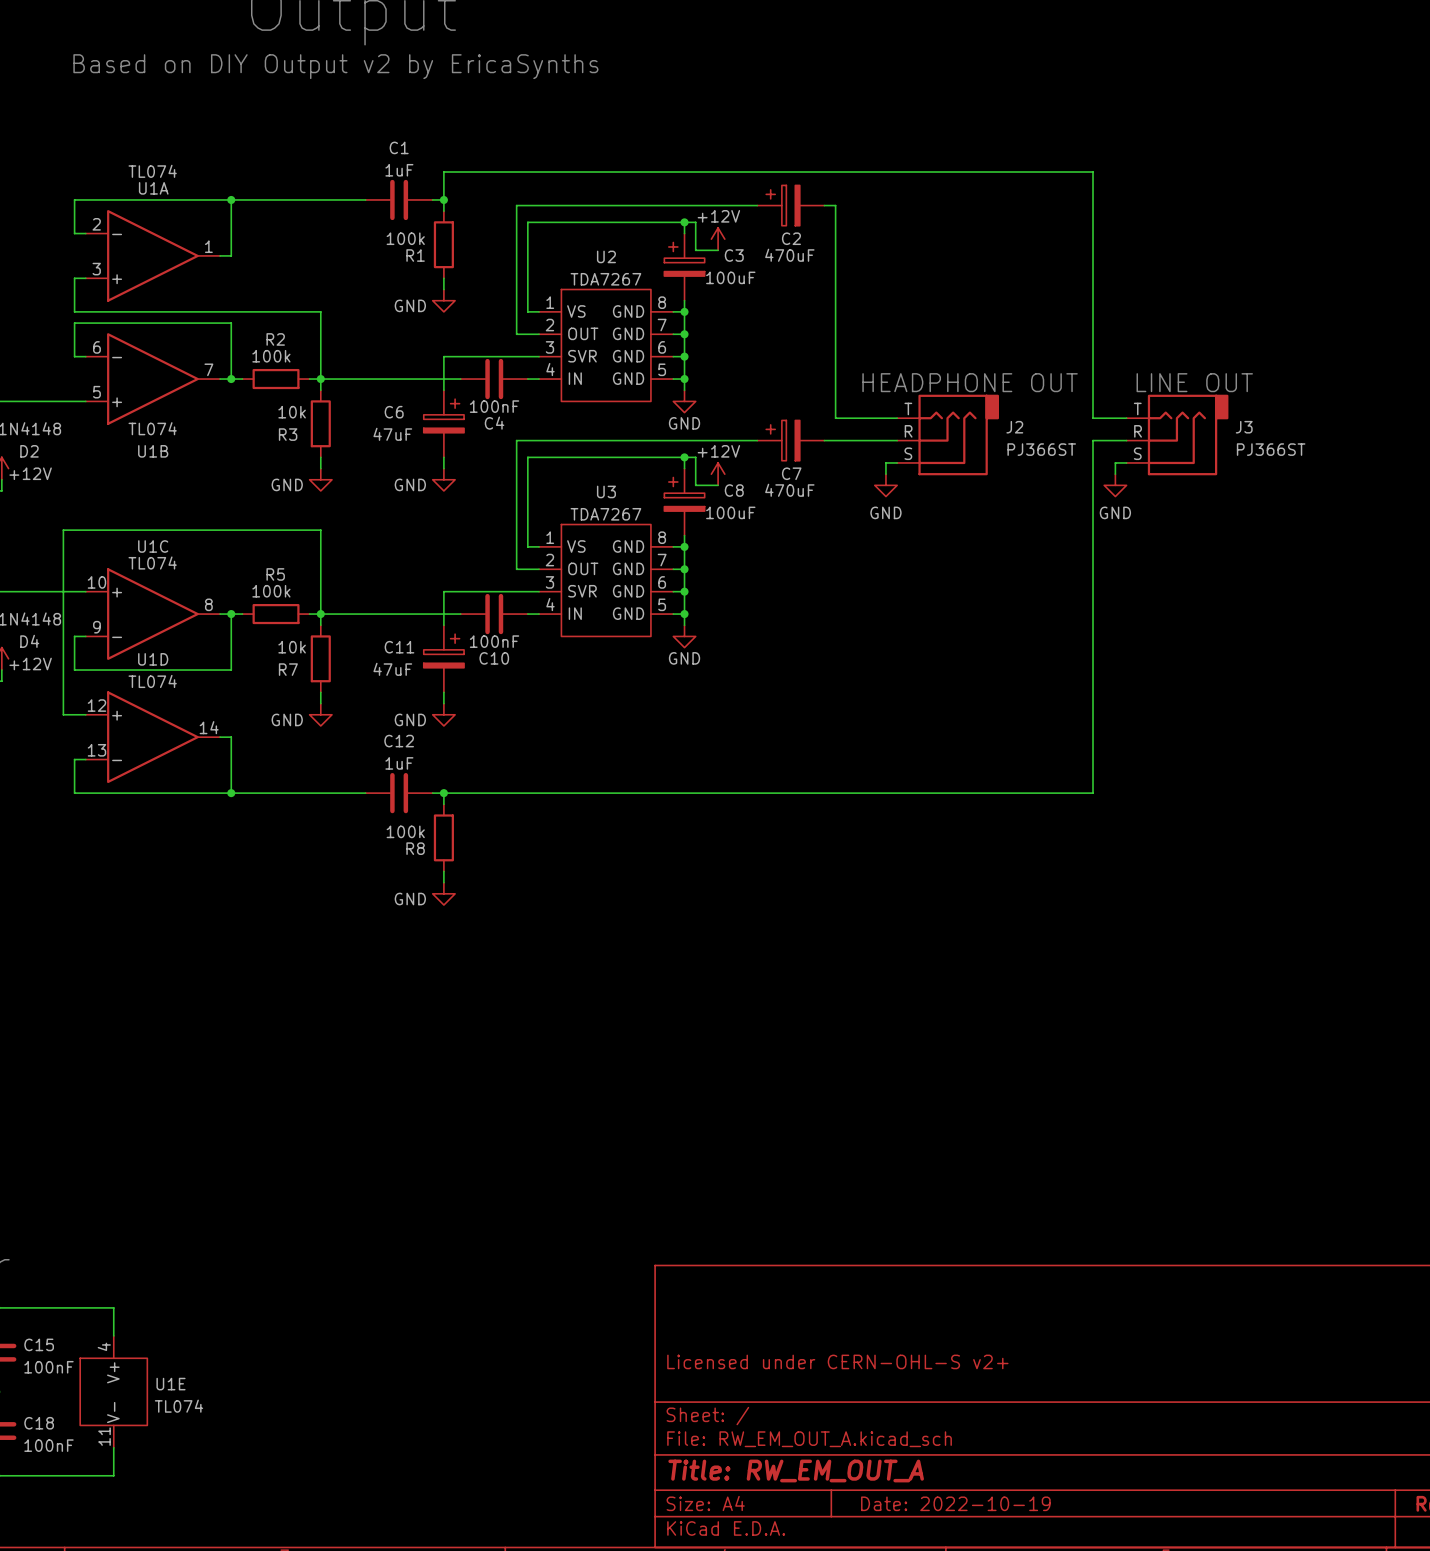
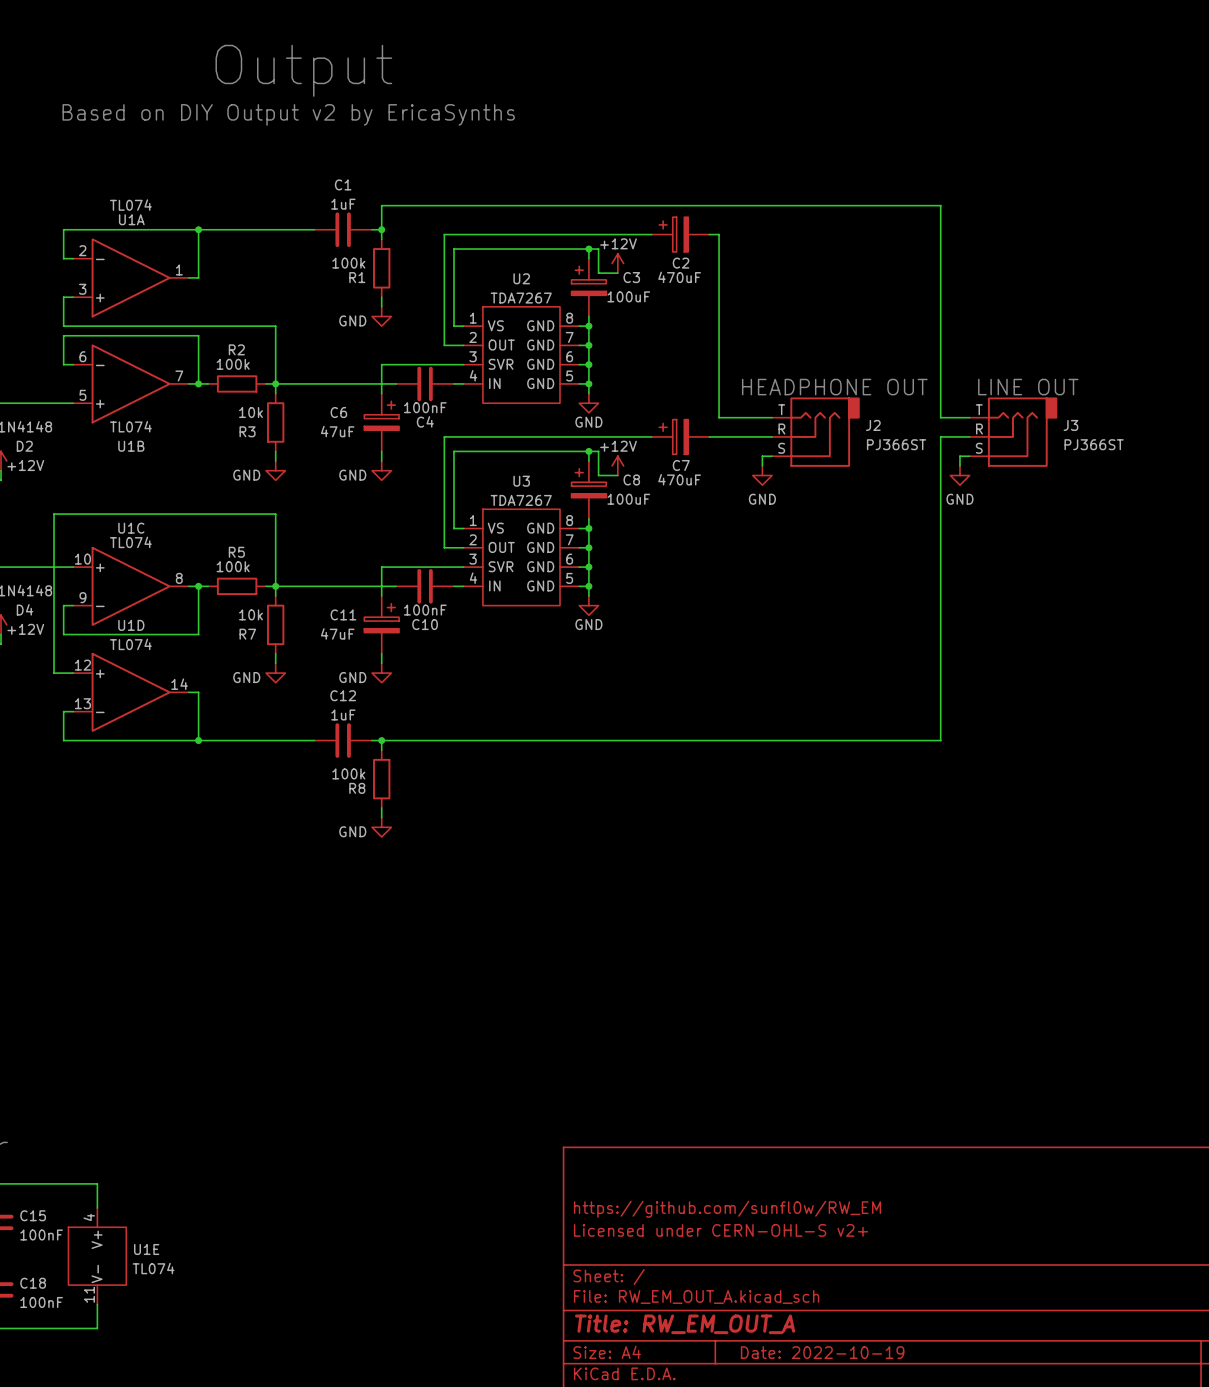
title block: none -> https://github.com/sunfl0w/RW_EM (727, 1209)

